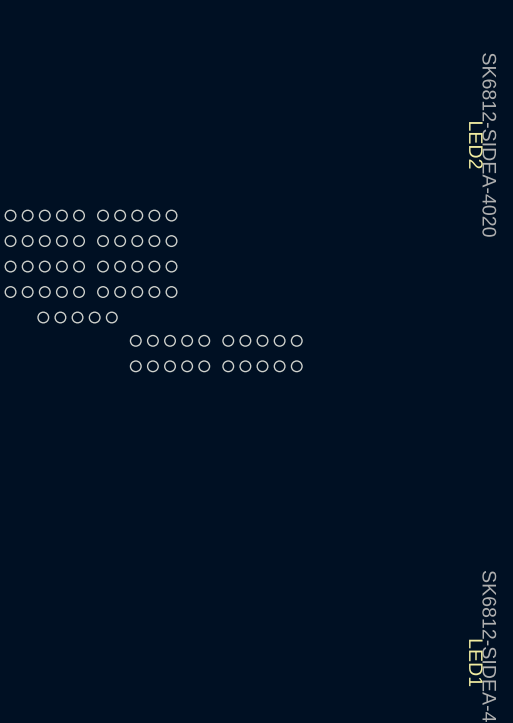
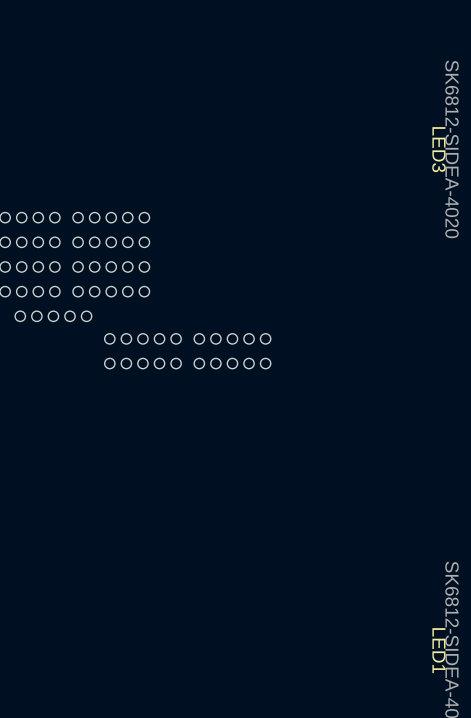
LED2 name: LED2 (475, 145) -> LED3 (438, 149)

